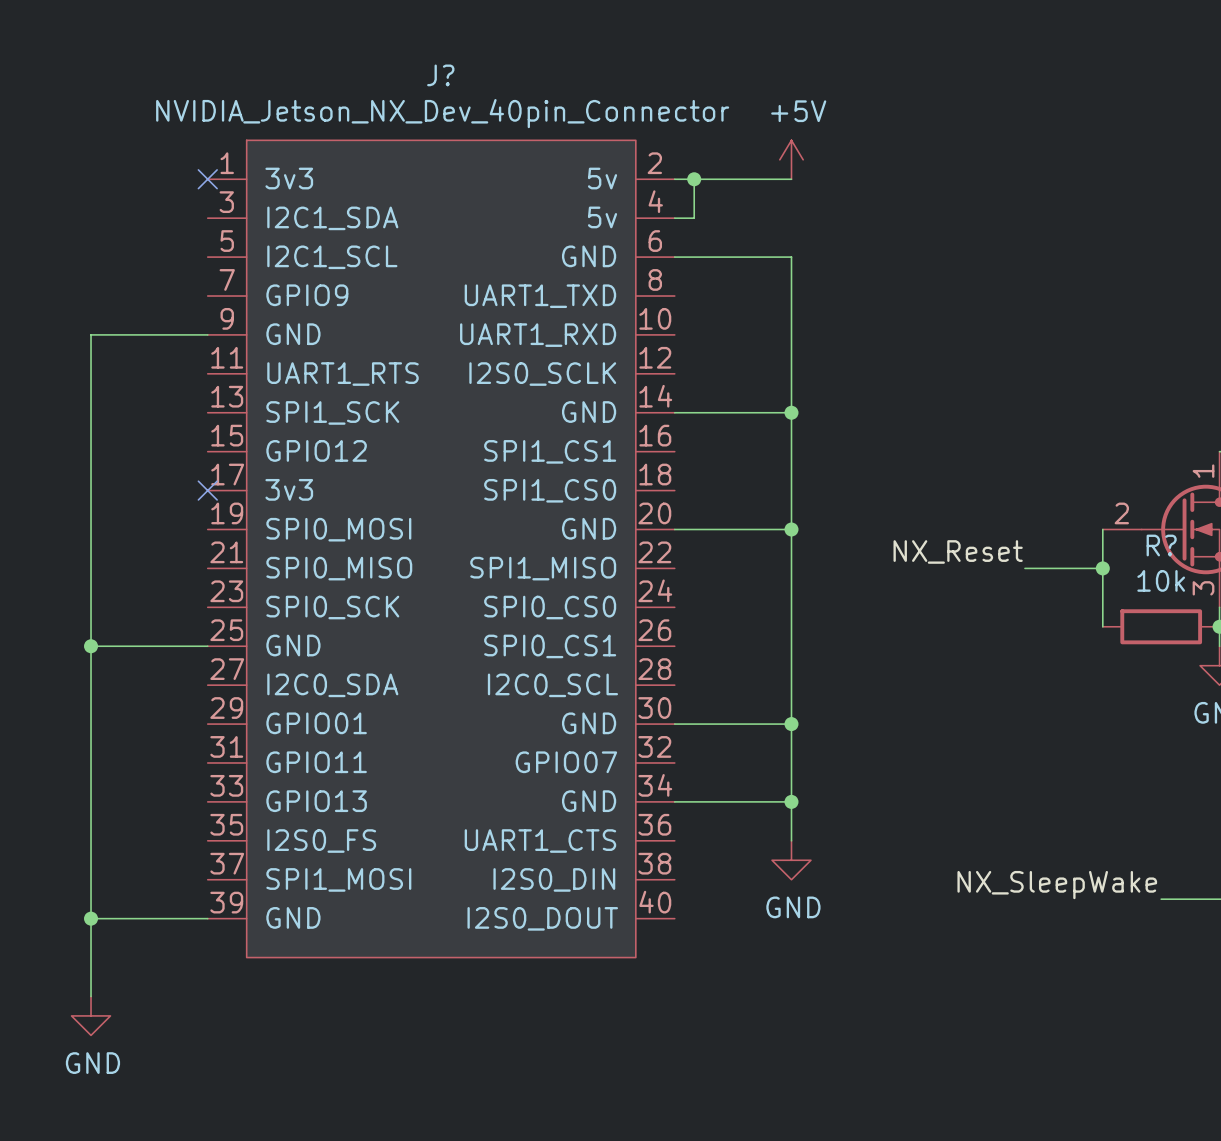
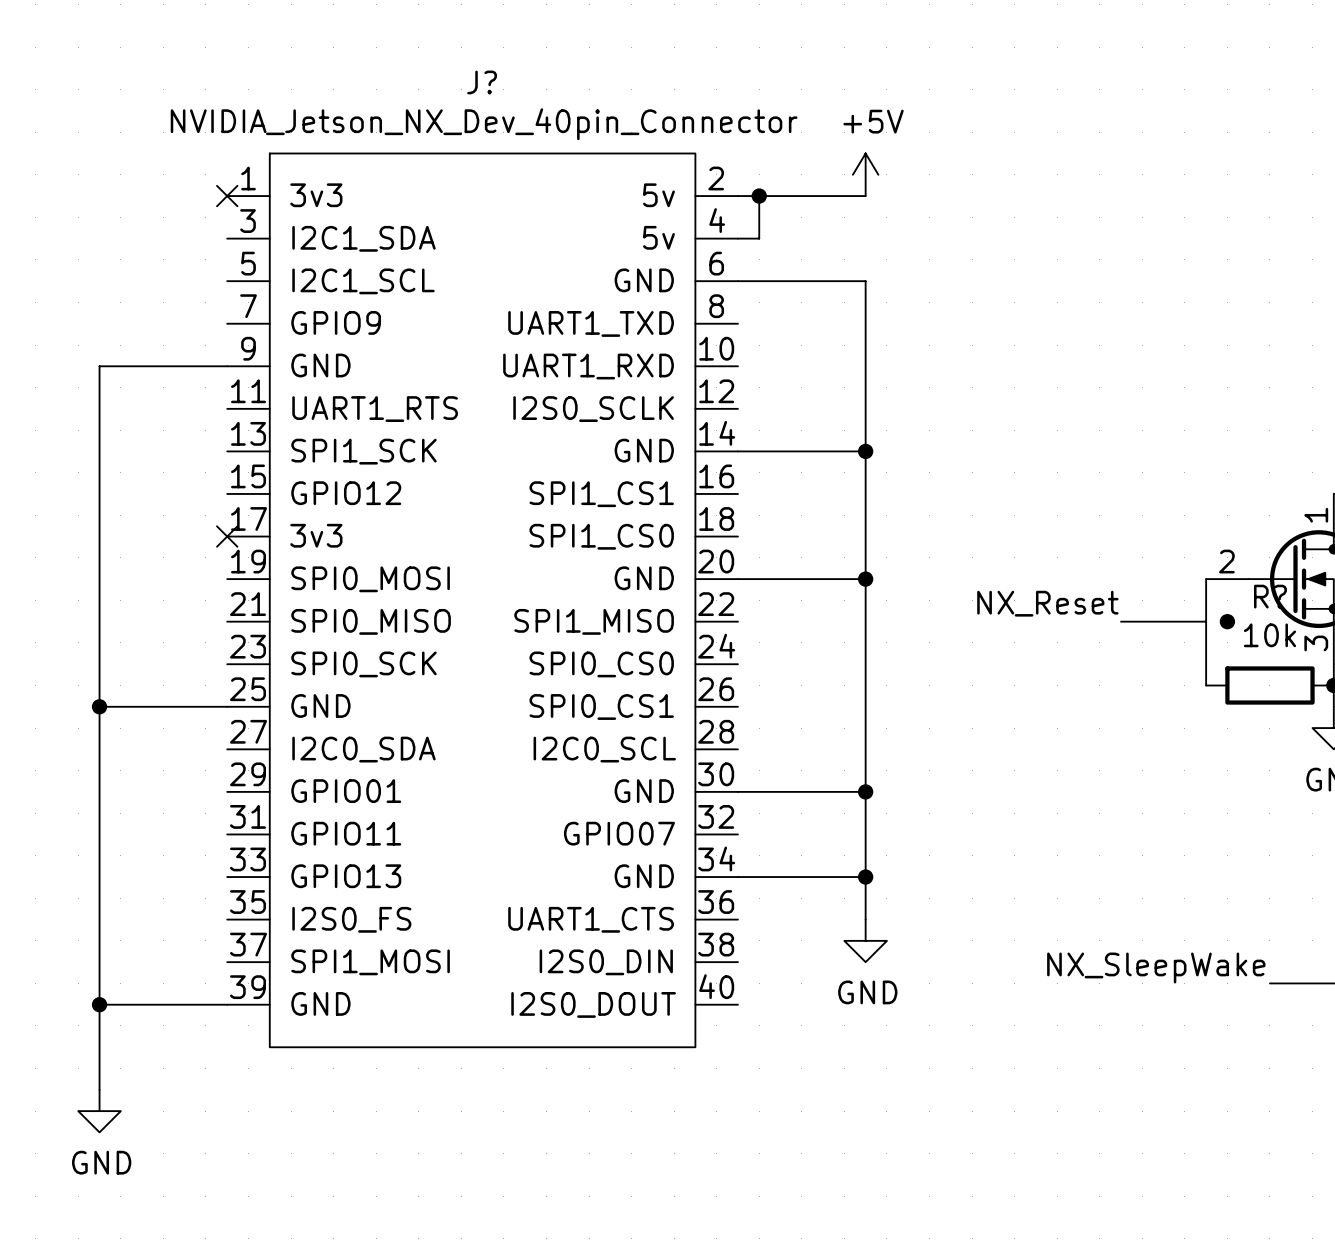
junction position: (1102, 568) -> (1227, 621)

